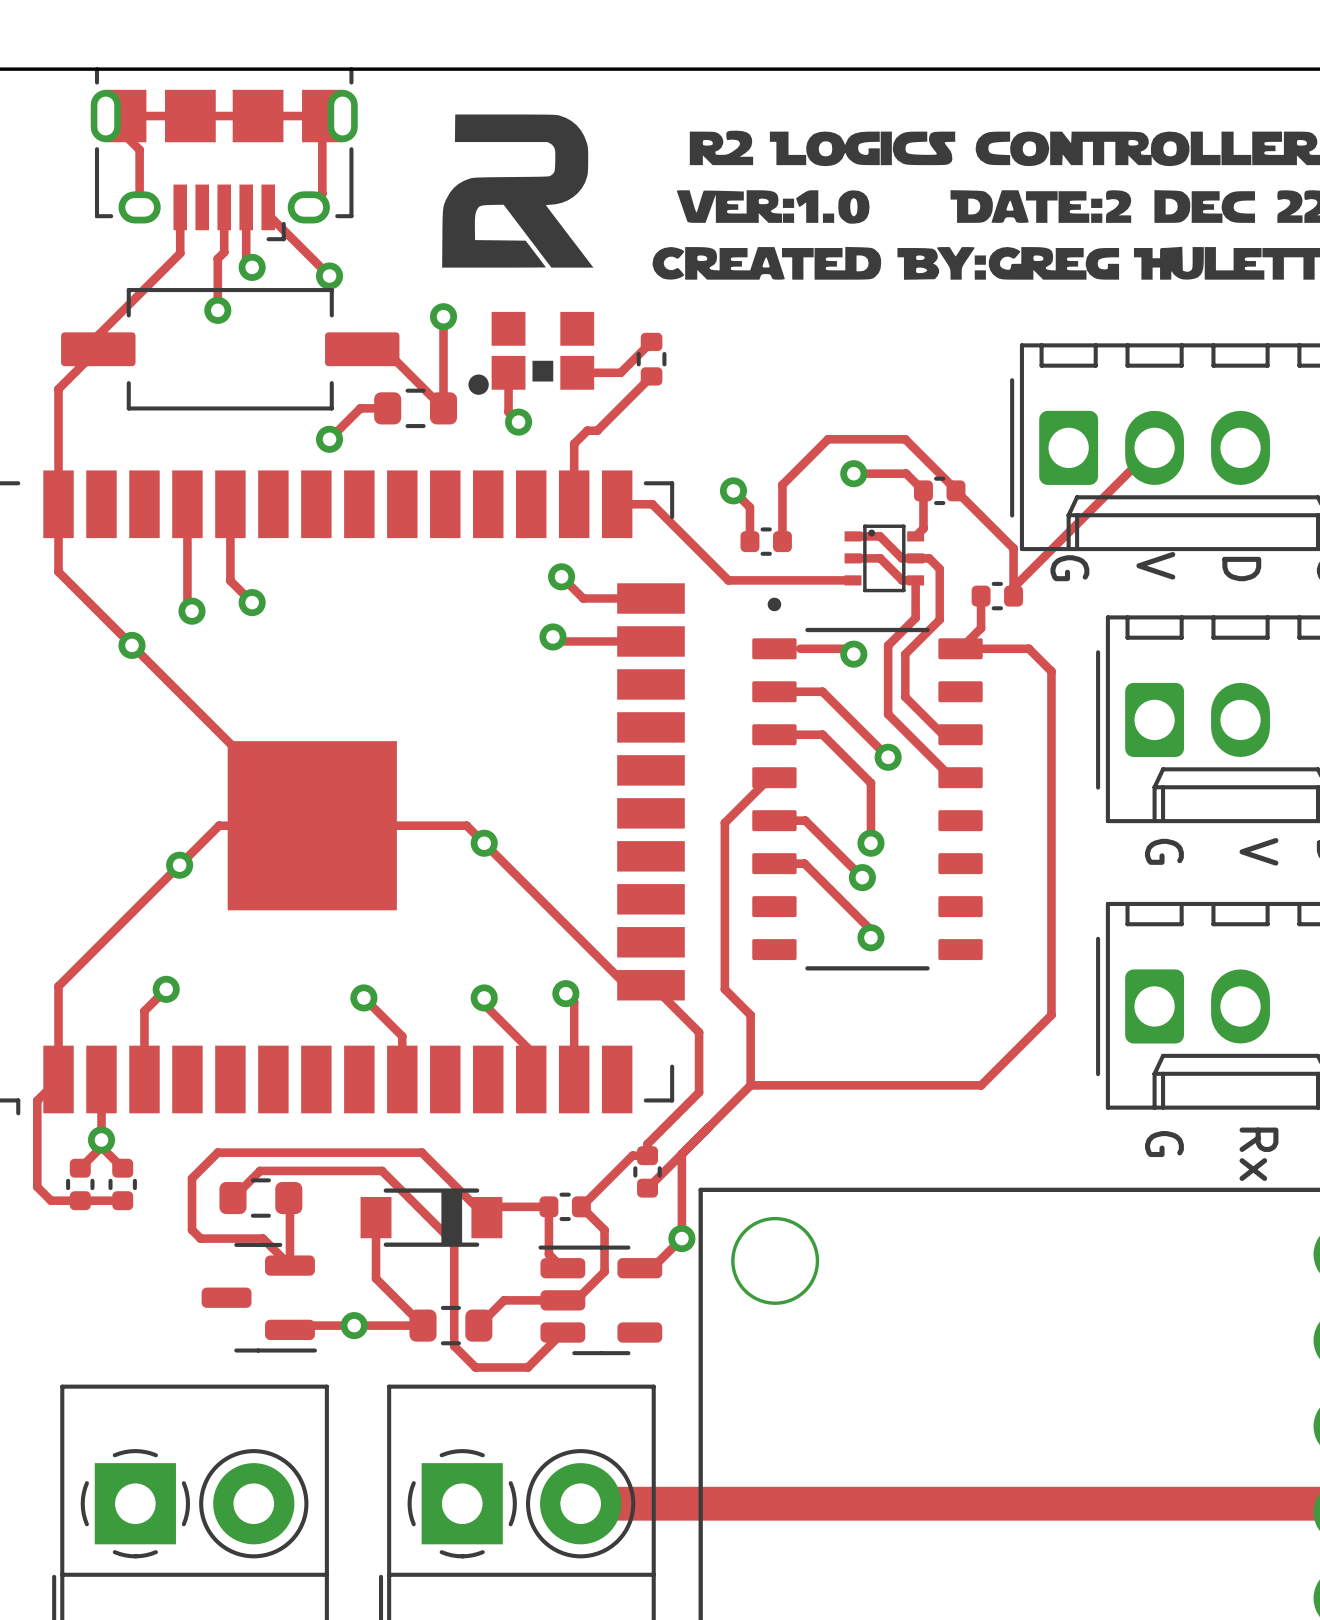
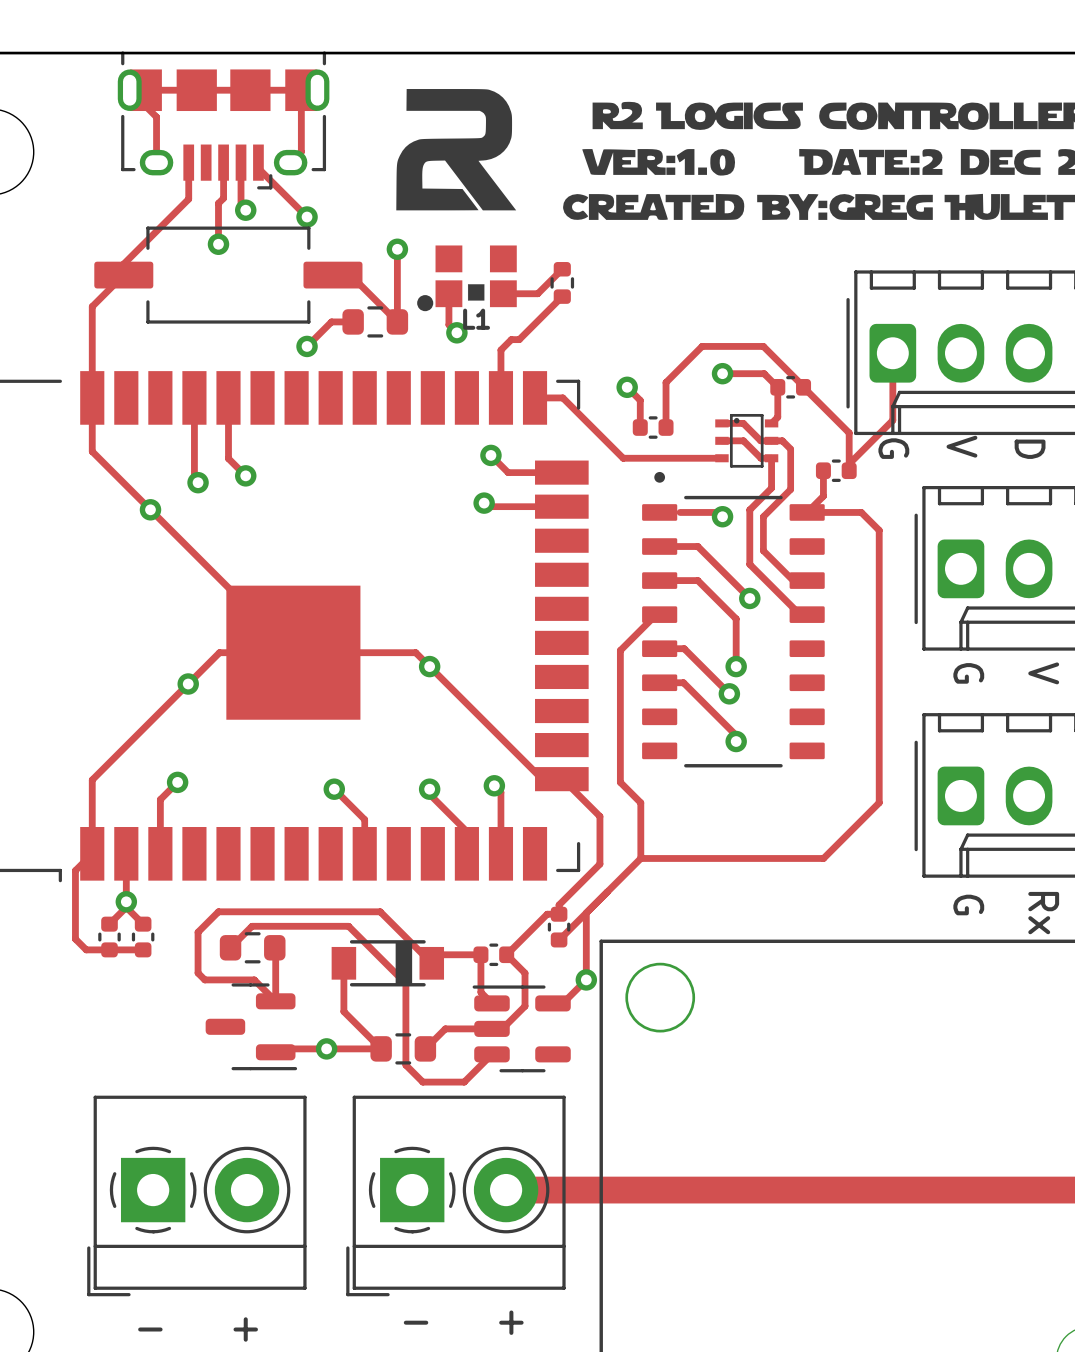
L1 name: none -> L1 (476, 319)
track: (1164, 436) (1068, 532) -> (892, 353) (892, 420)

